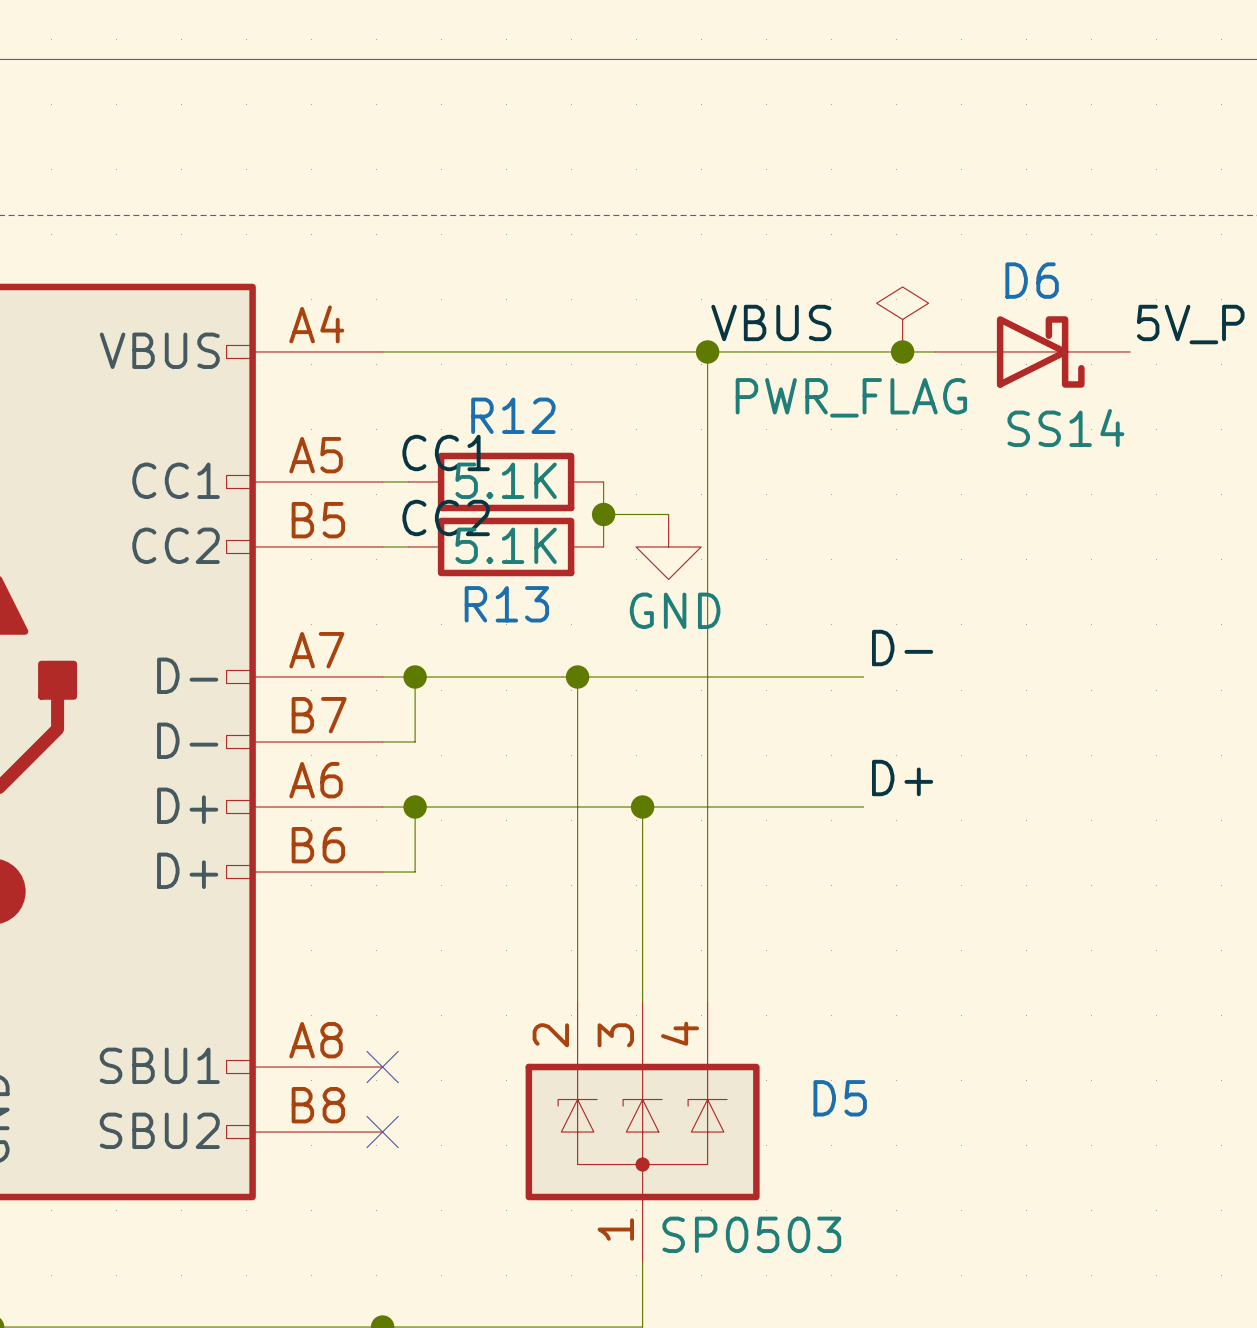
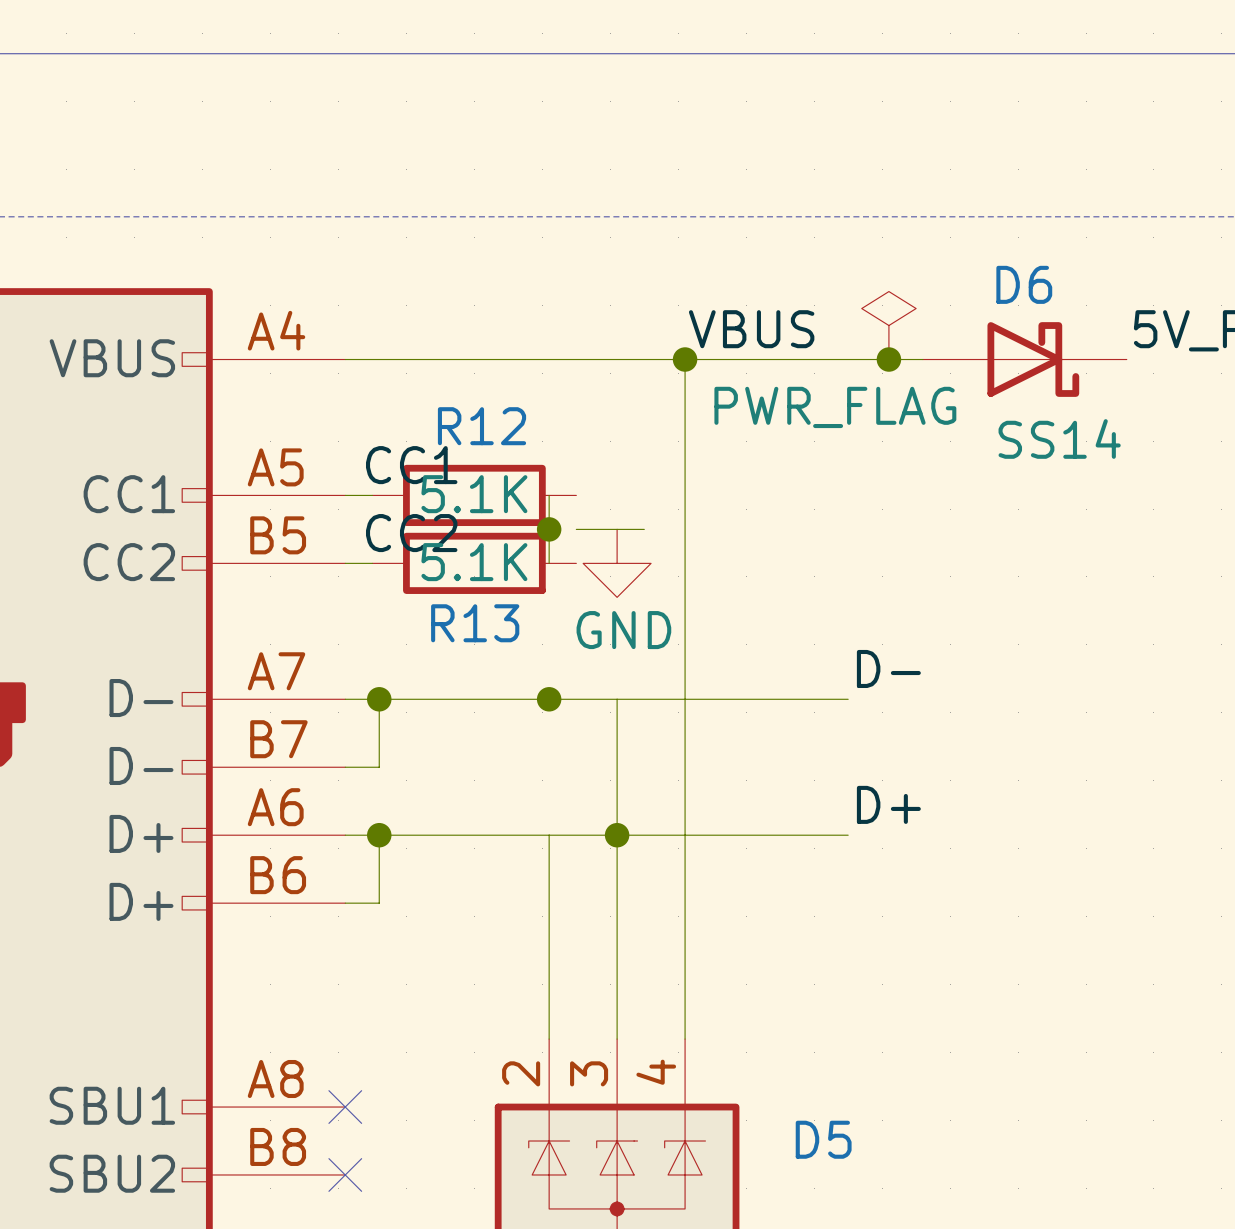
wire: (603, 481) (603, 546) -> (549, 495) (549, 563)
junction position: (603, 514) -> (549, 529)
power symbol position: GND (668, 546) -> GND (617, 563)
wire: (577, 677) (577, 807) -> (617, 699) (617, 835)

